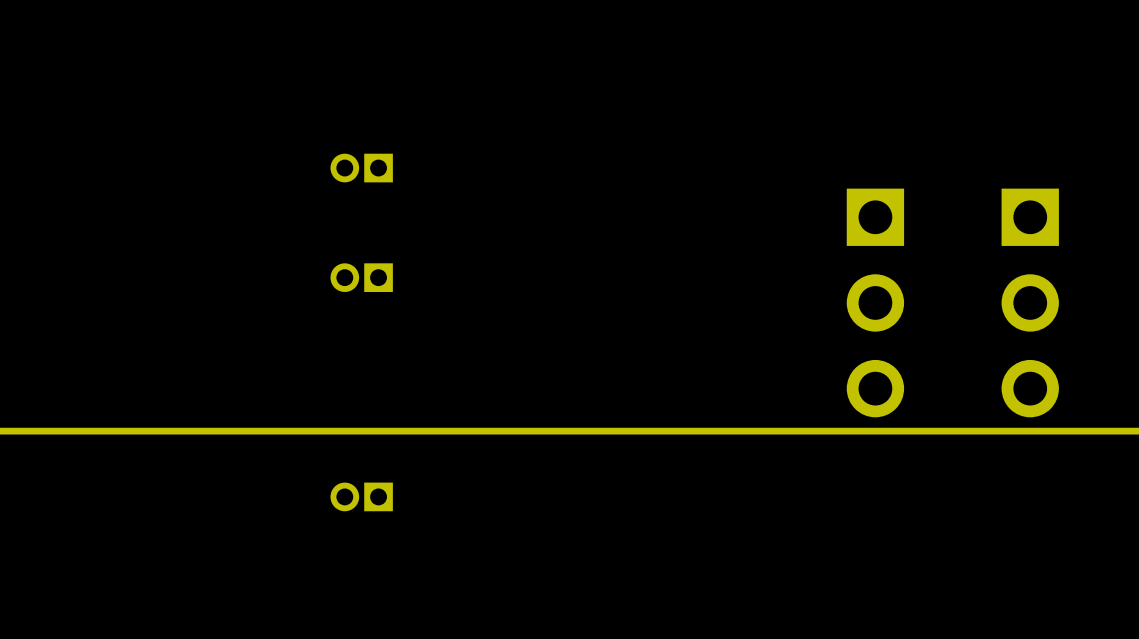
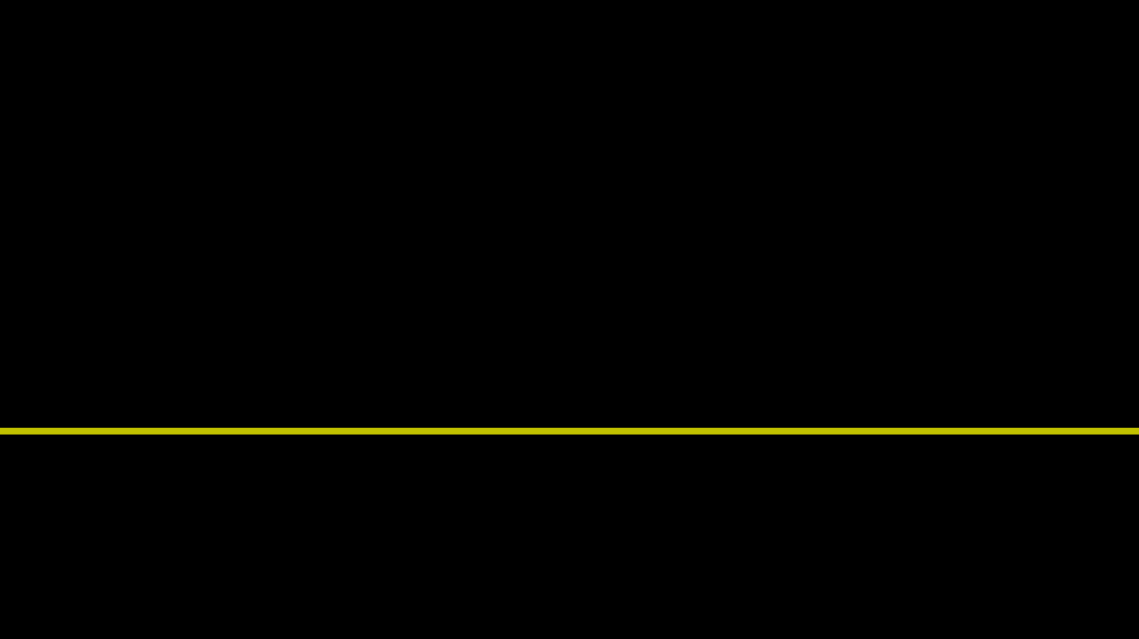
part: (361, 168) -> none
part: (361, 277) -> none
part: (875, 302) -> none
part: (1030, 302) -> none
part: (361, 496) -> none

